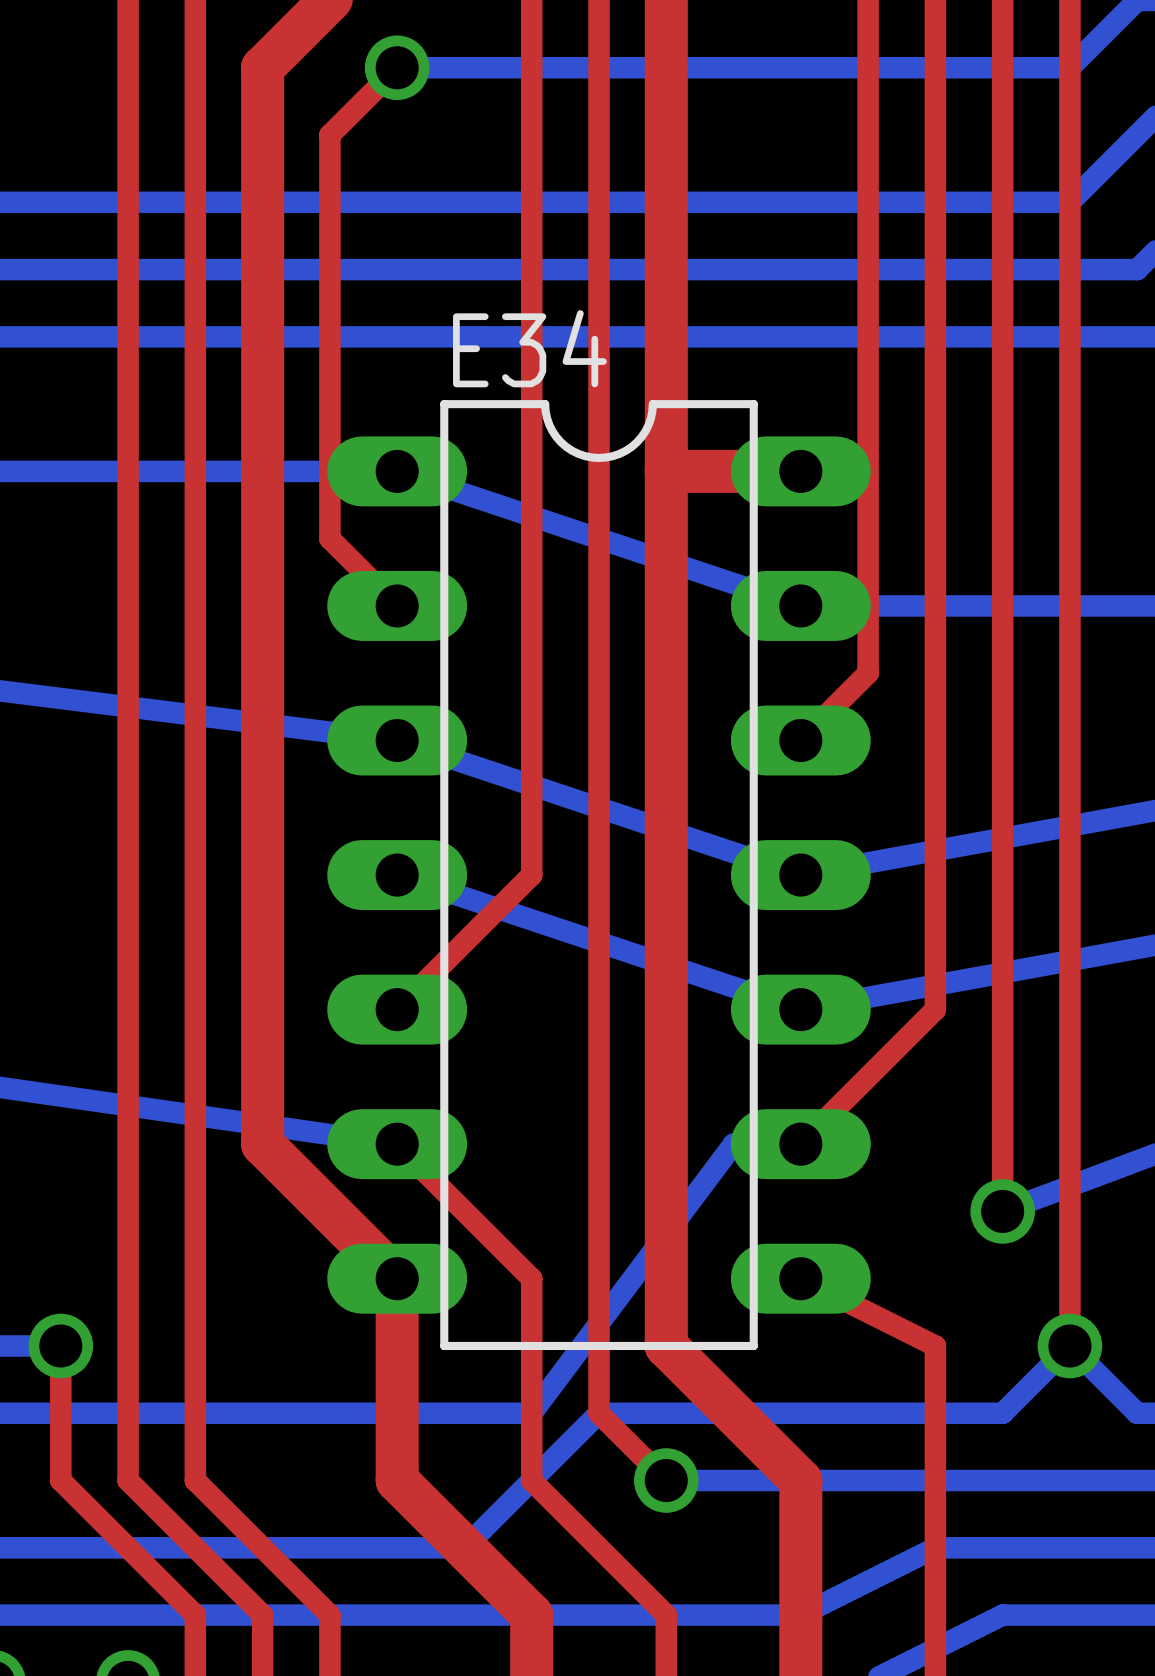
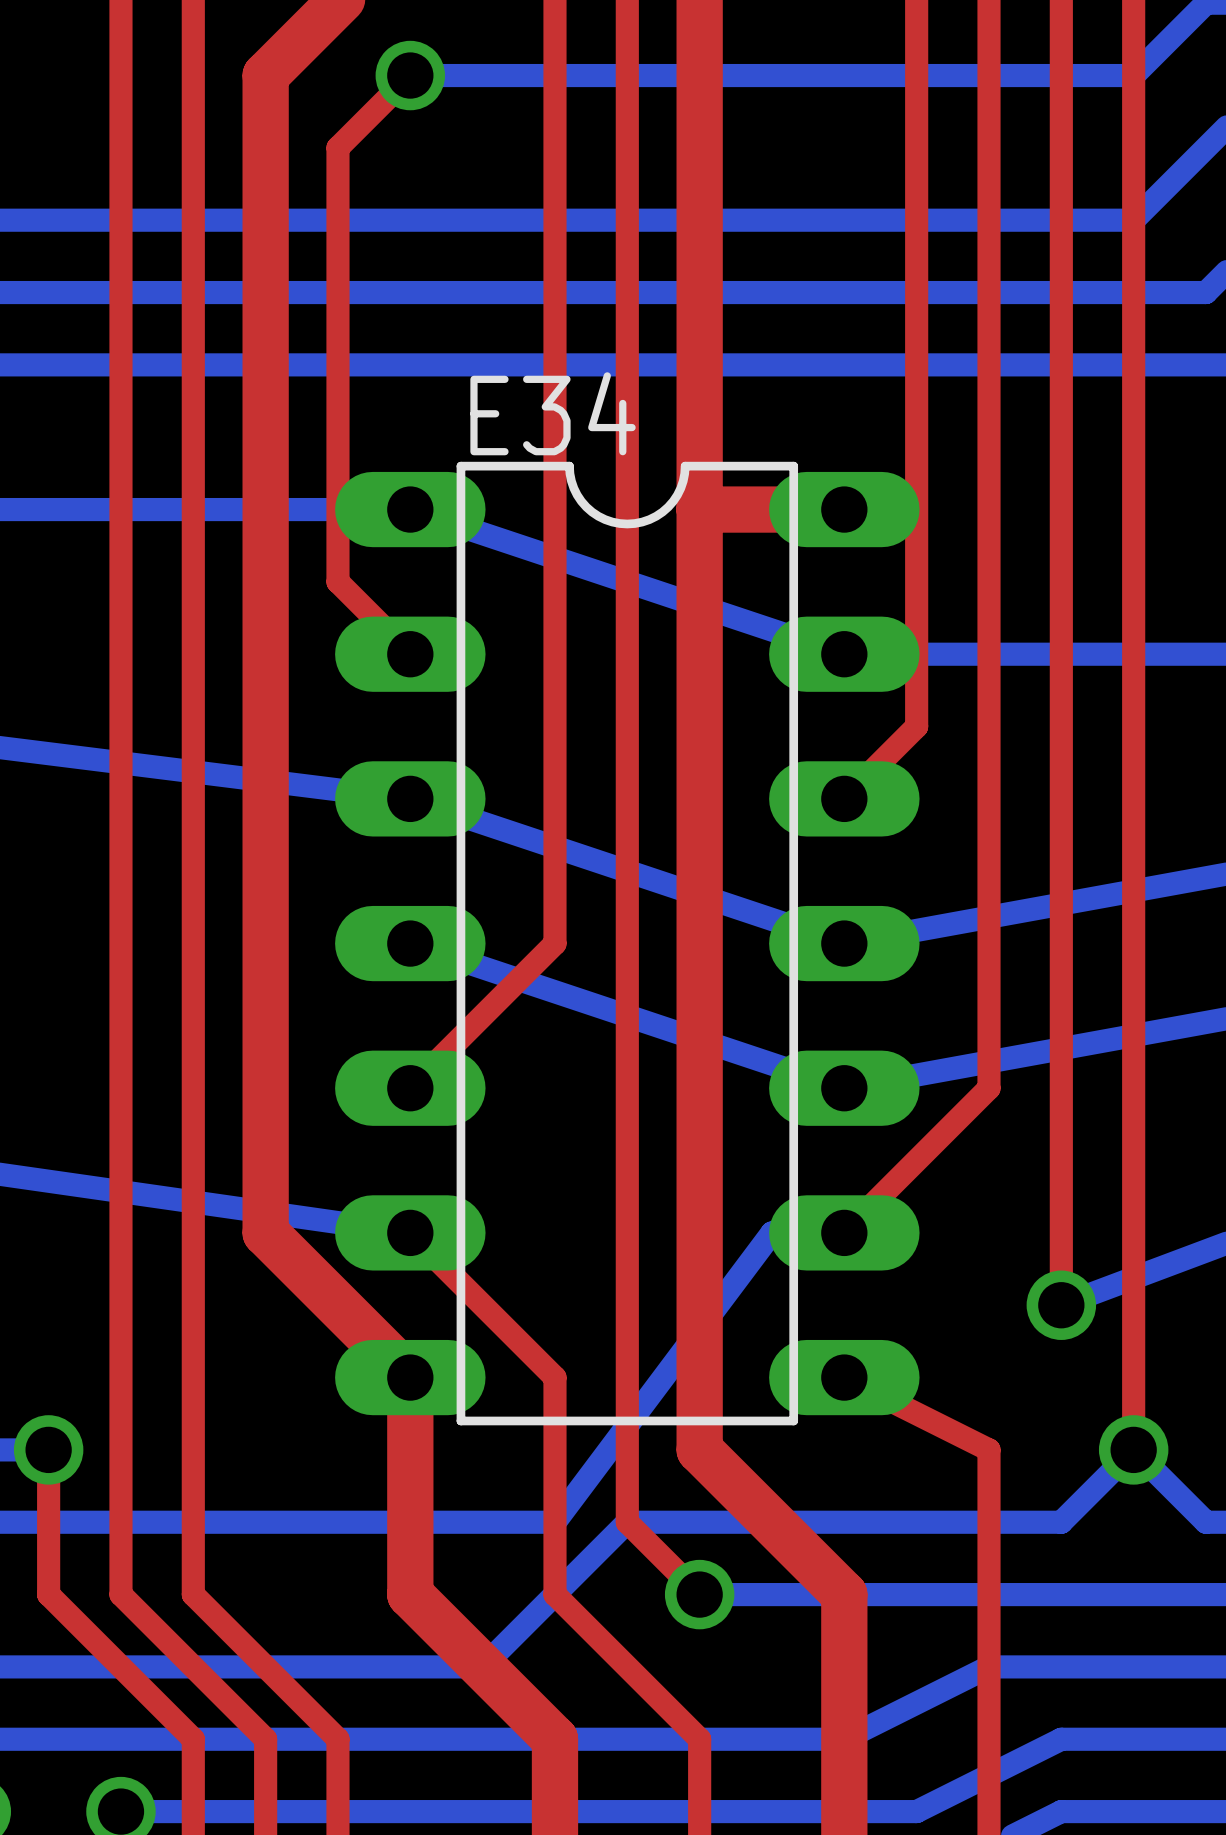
E34 name position: E34 (529, 348) -> E34 (553, 413)
E34 footprint: [327, 400, 871, 1351] -> [335, 461, 920, 1426]

